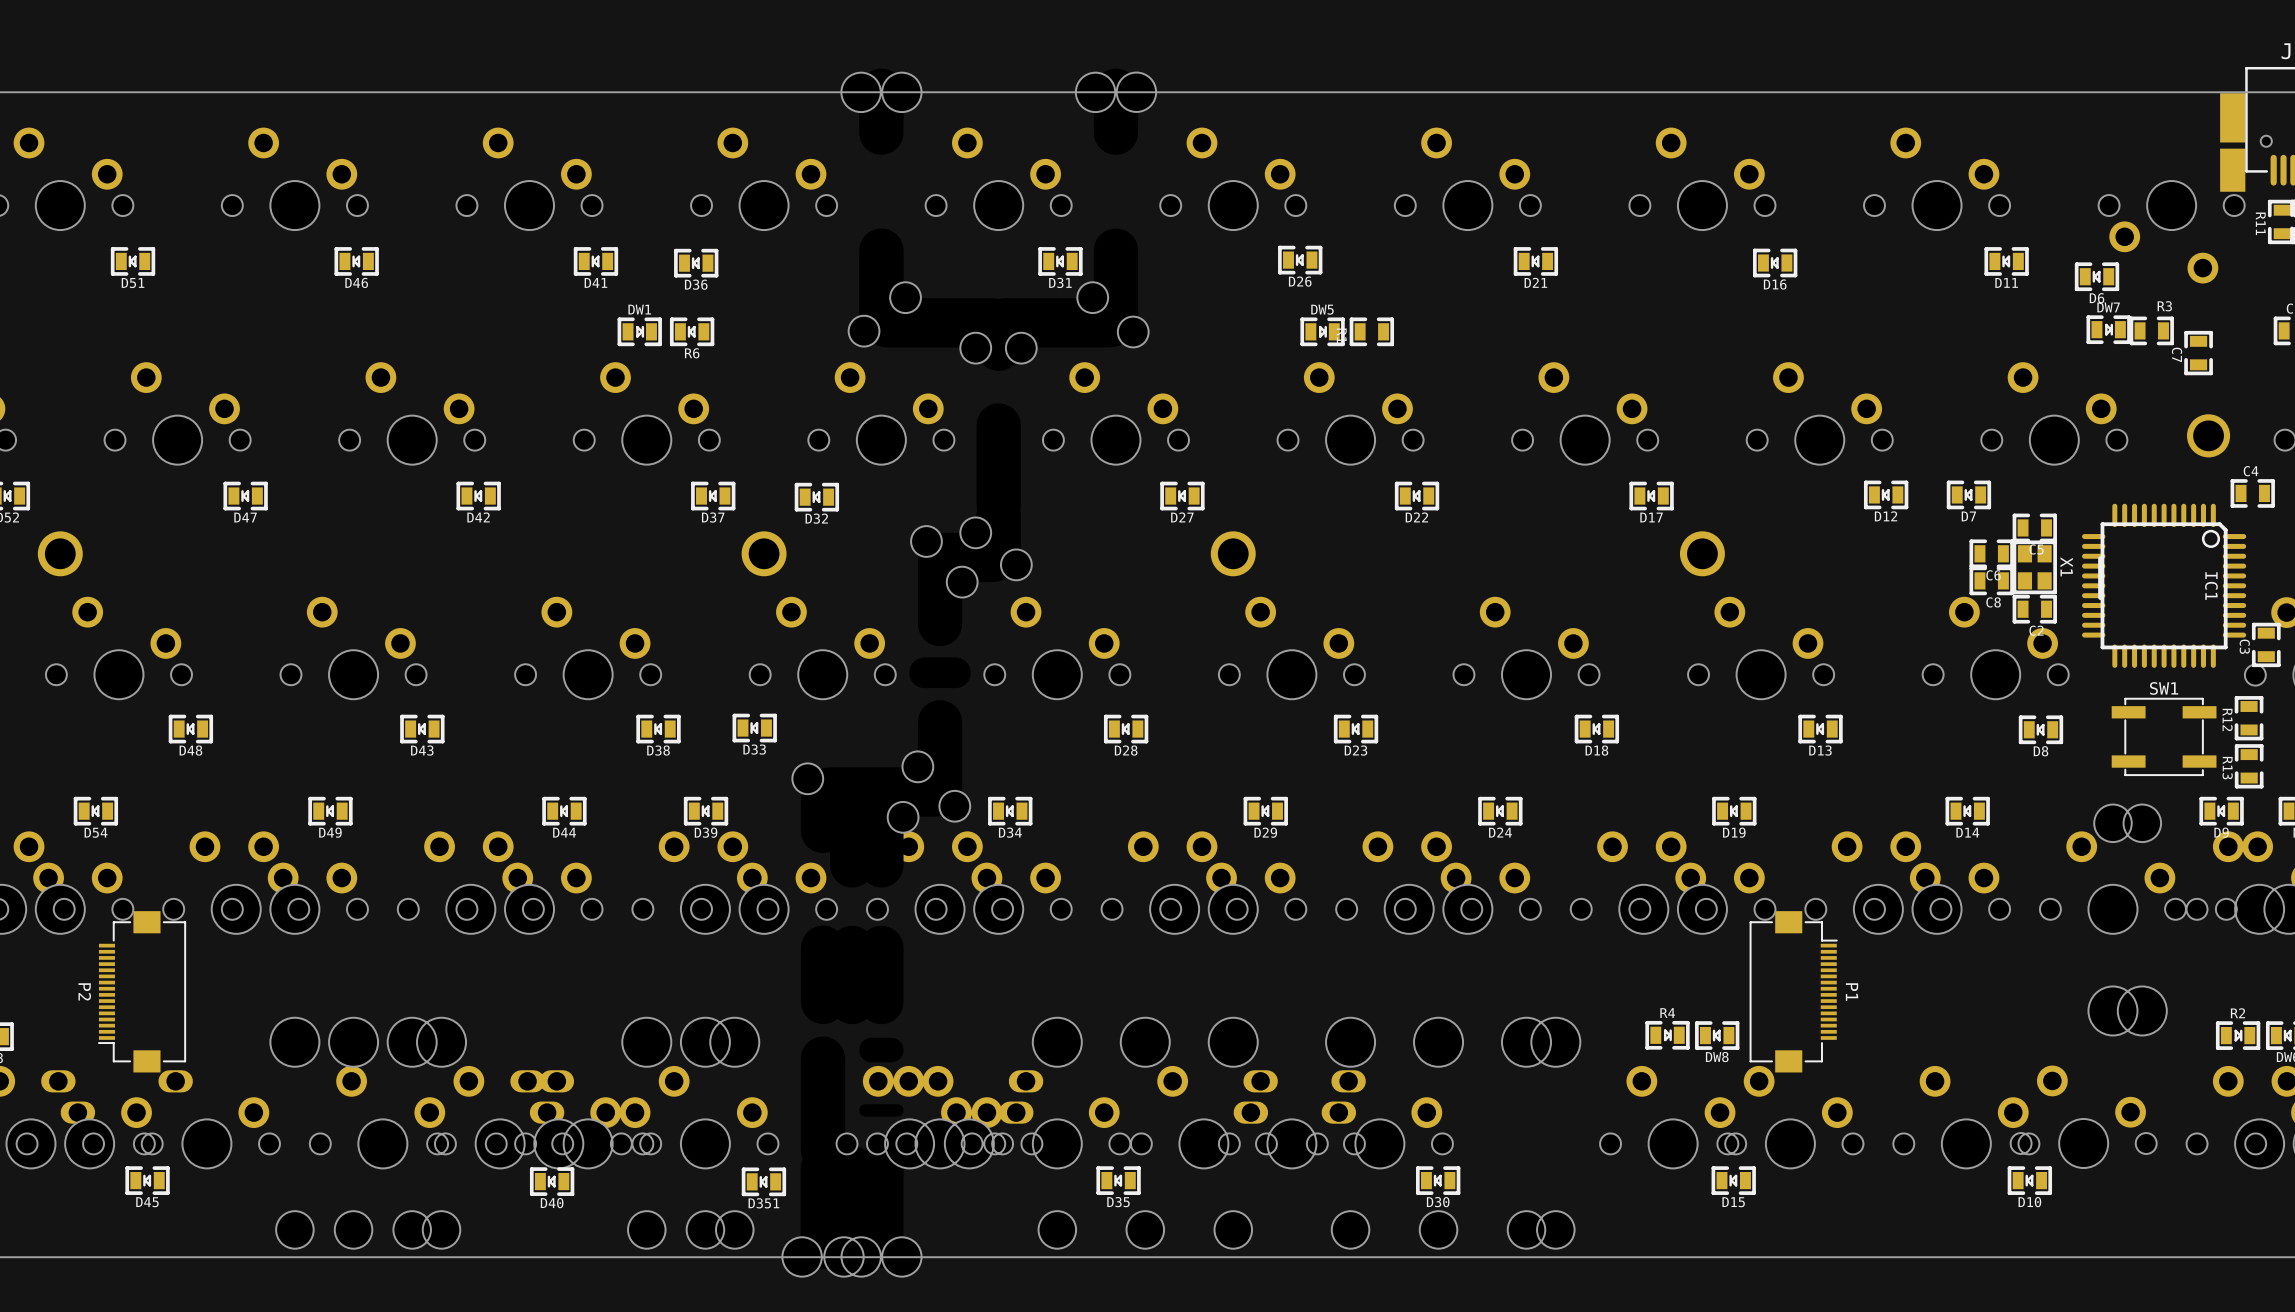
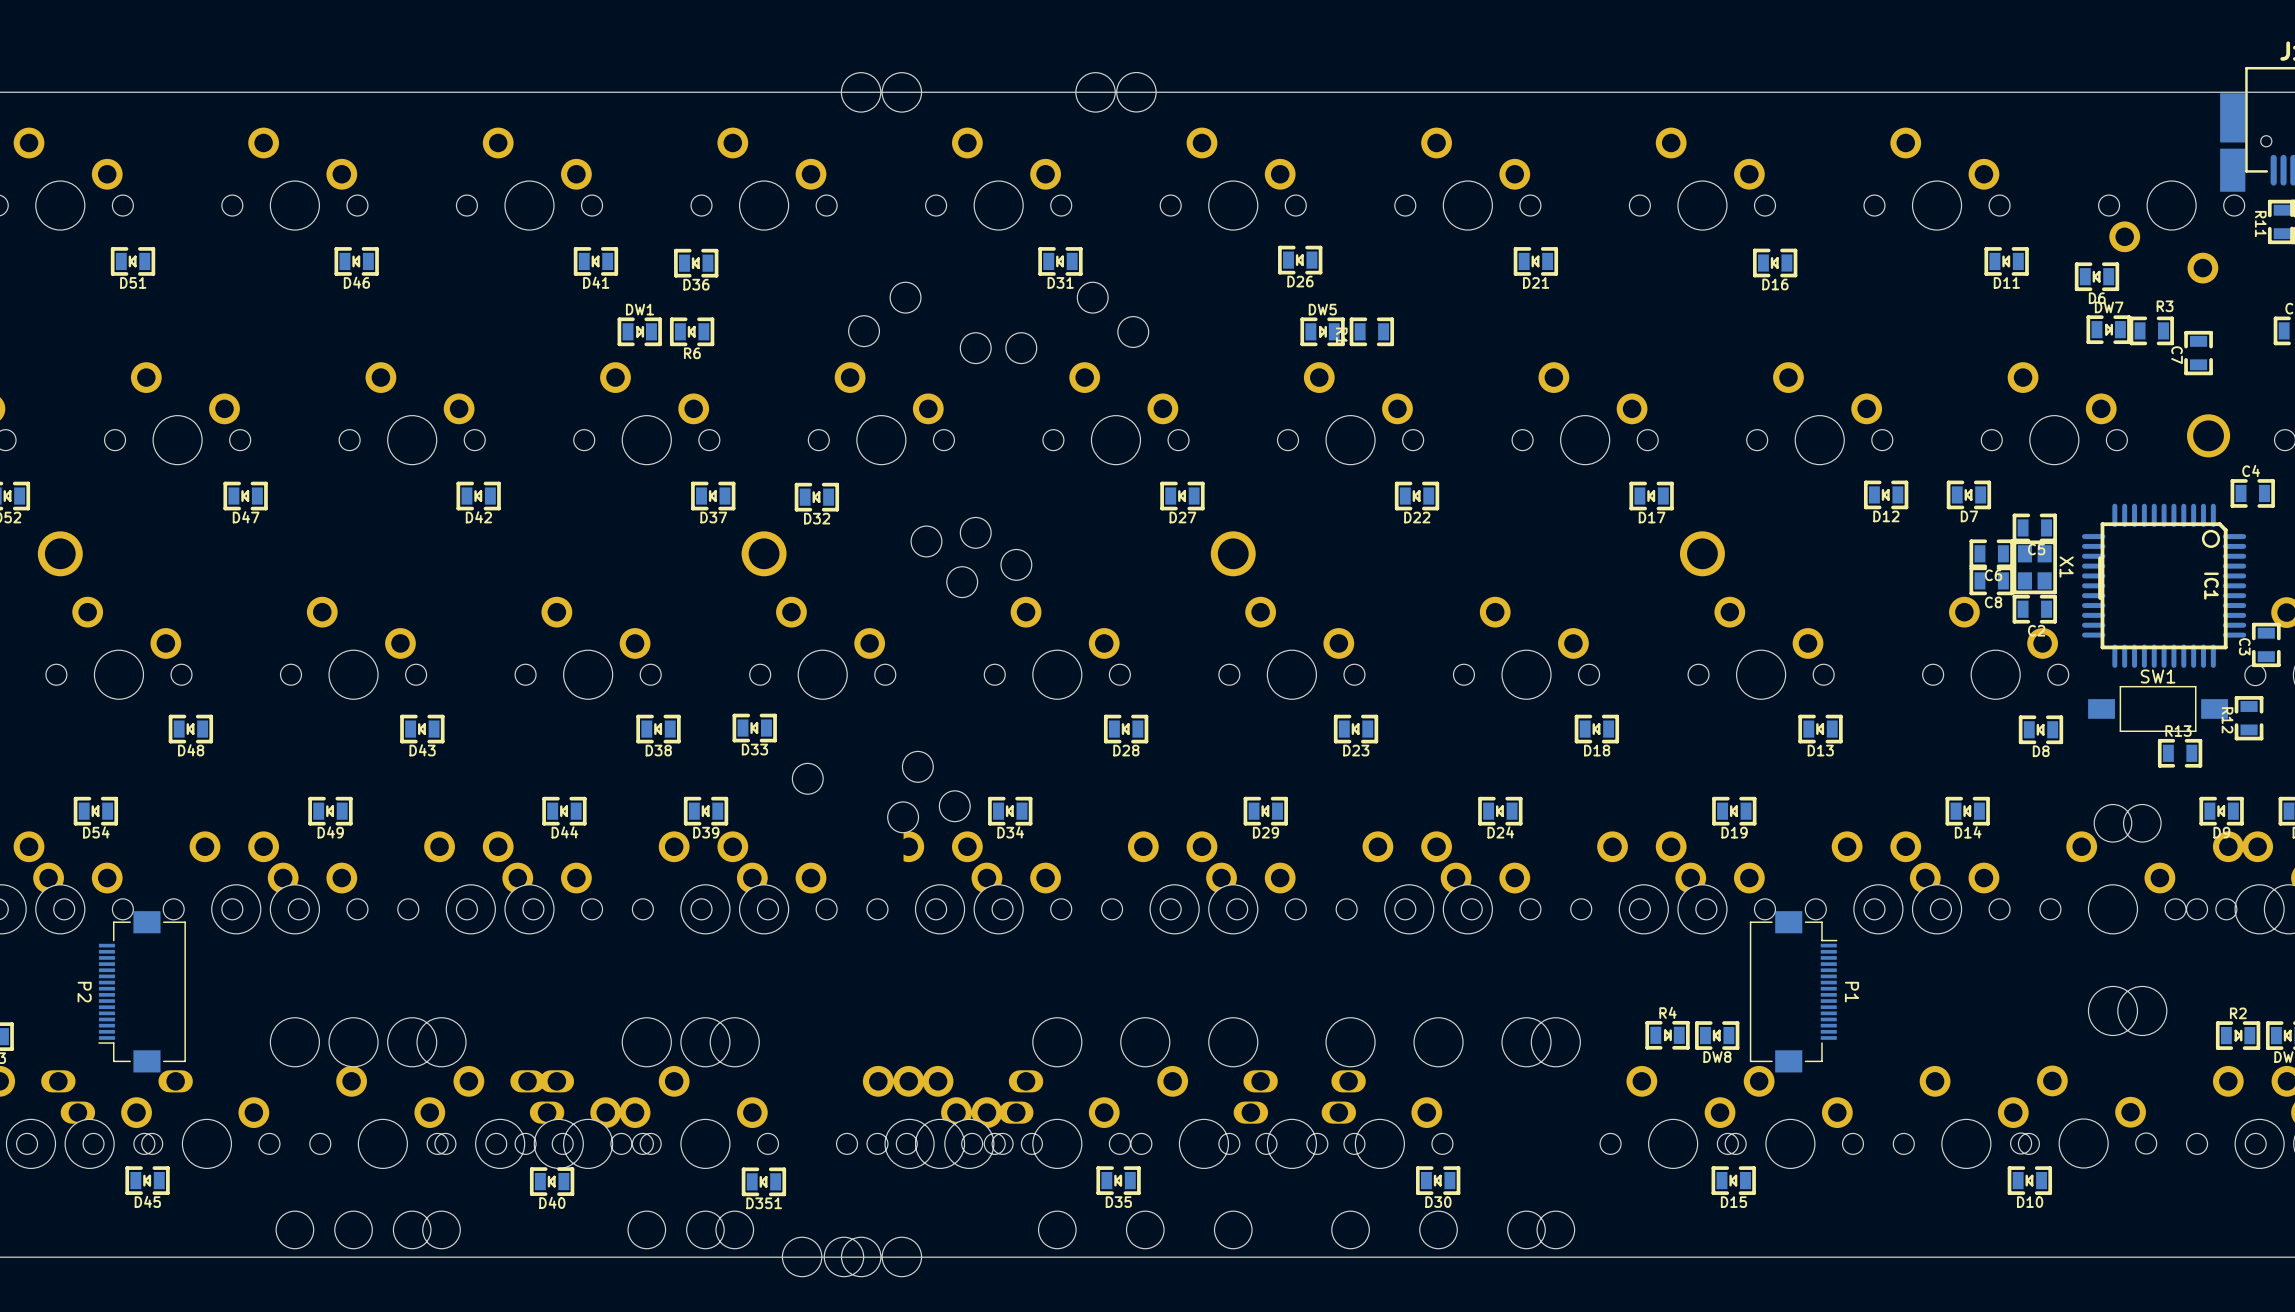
SW1 footprint: [2111, 698, 2217, 776] -> [2088, 685, 2229, 732]
R13 rotation: 0° (2249, 766) -> 90° clockwise (2180, 753)
R13 position: (2249, 766) -> (2180, 753)

